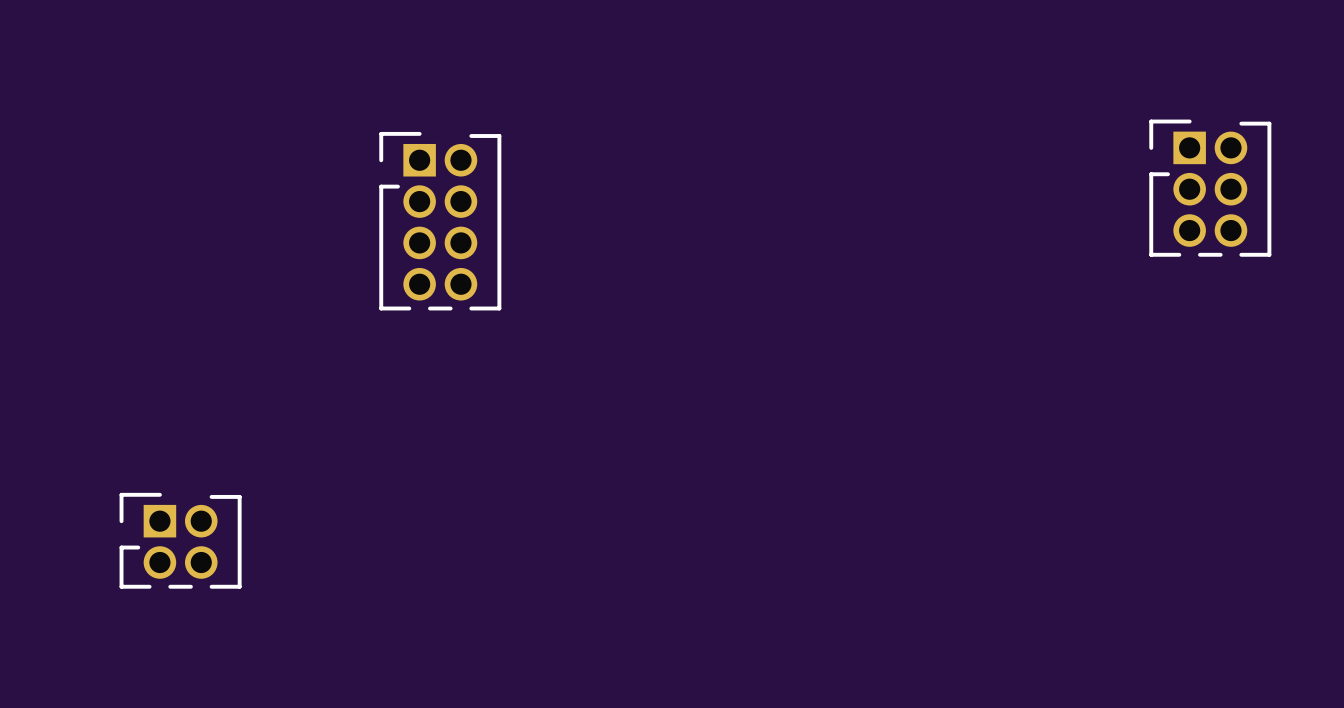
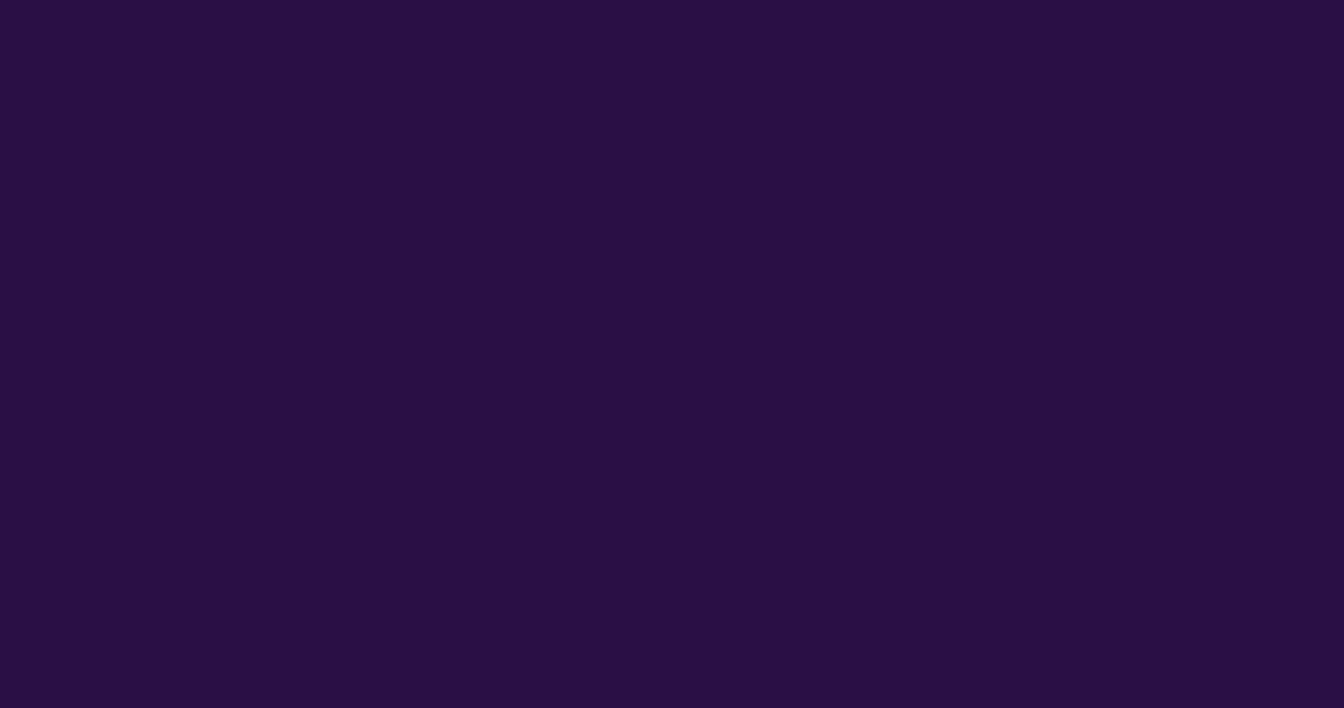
part: (1210, 188) -> none
part: (440, 221) -> none
part: (180, 540) -> none

